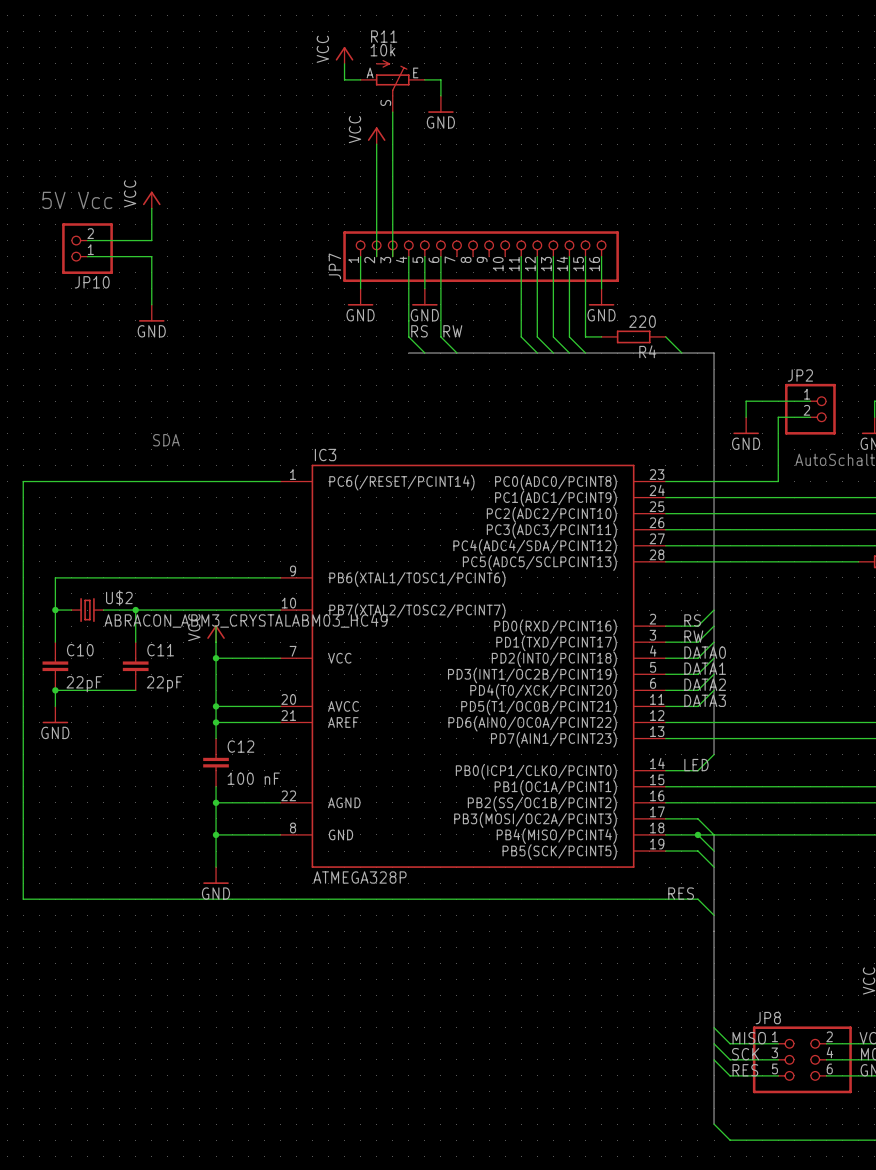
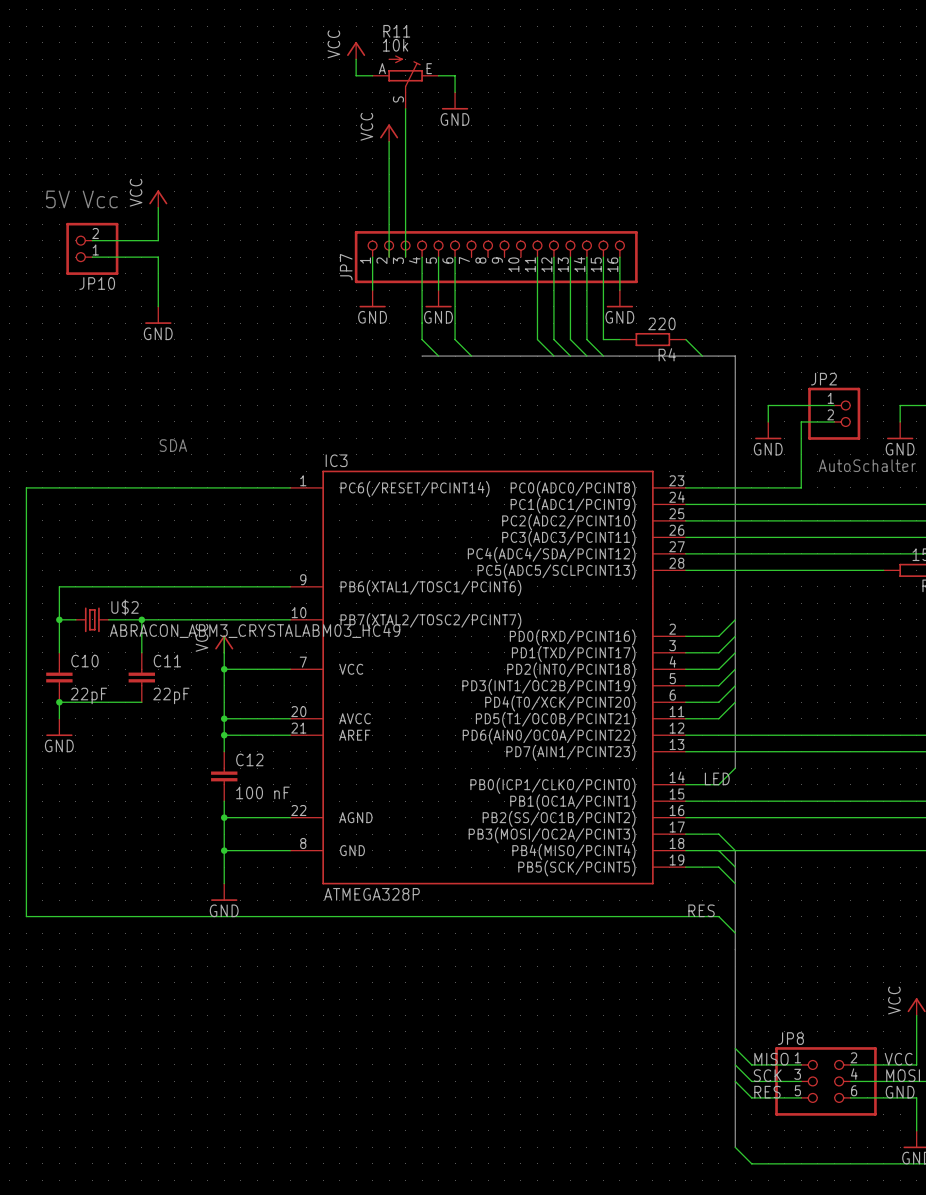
label: RS (419, 331) -> none
label: RW (452, 331) -> none
label: RS (692, 620) -> none
label: RW (693, 636) -> none
label: DATA0 (705, 652) -> none
label: DATA1 (705, 668) -> none
label: DATA2 (705, 684) -> none
label: DATA3 (705, 700) -> none
junction: (697, 834) -> none

